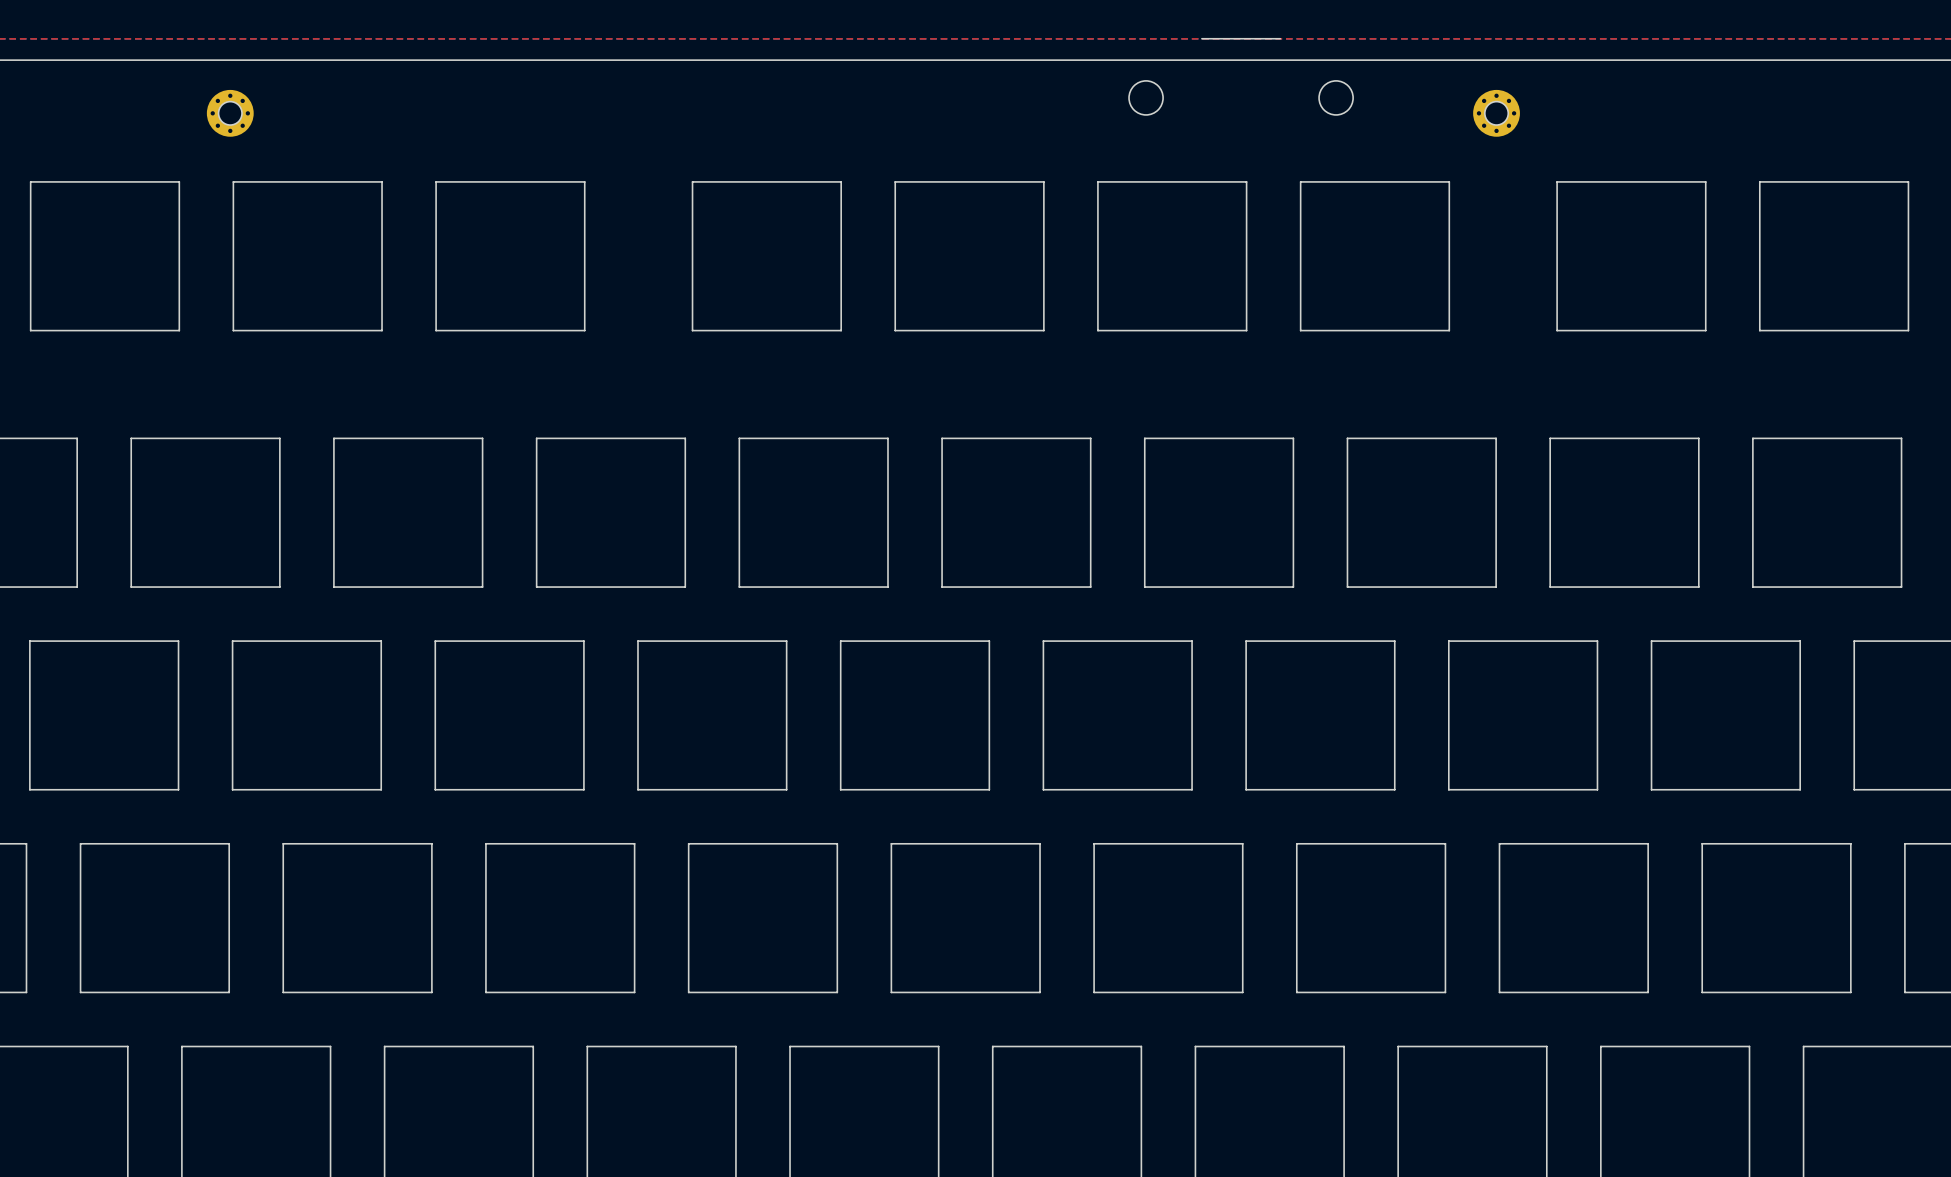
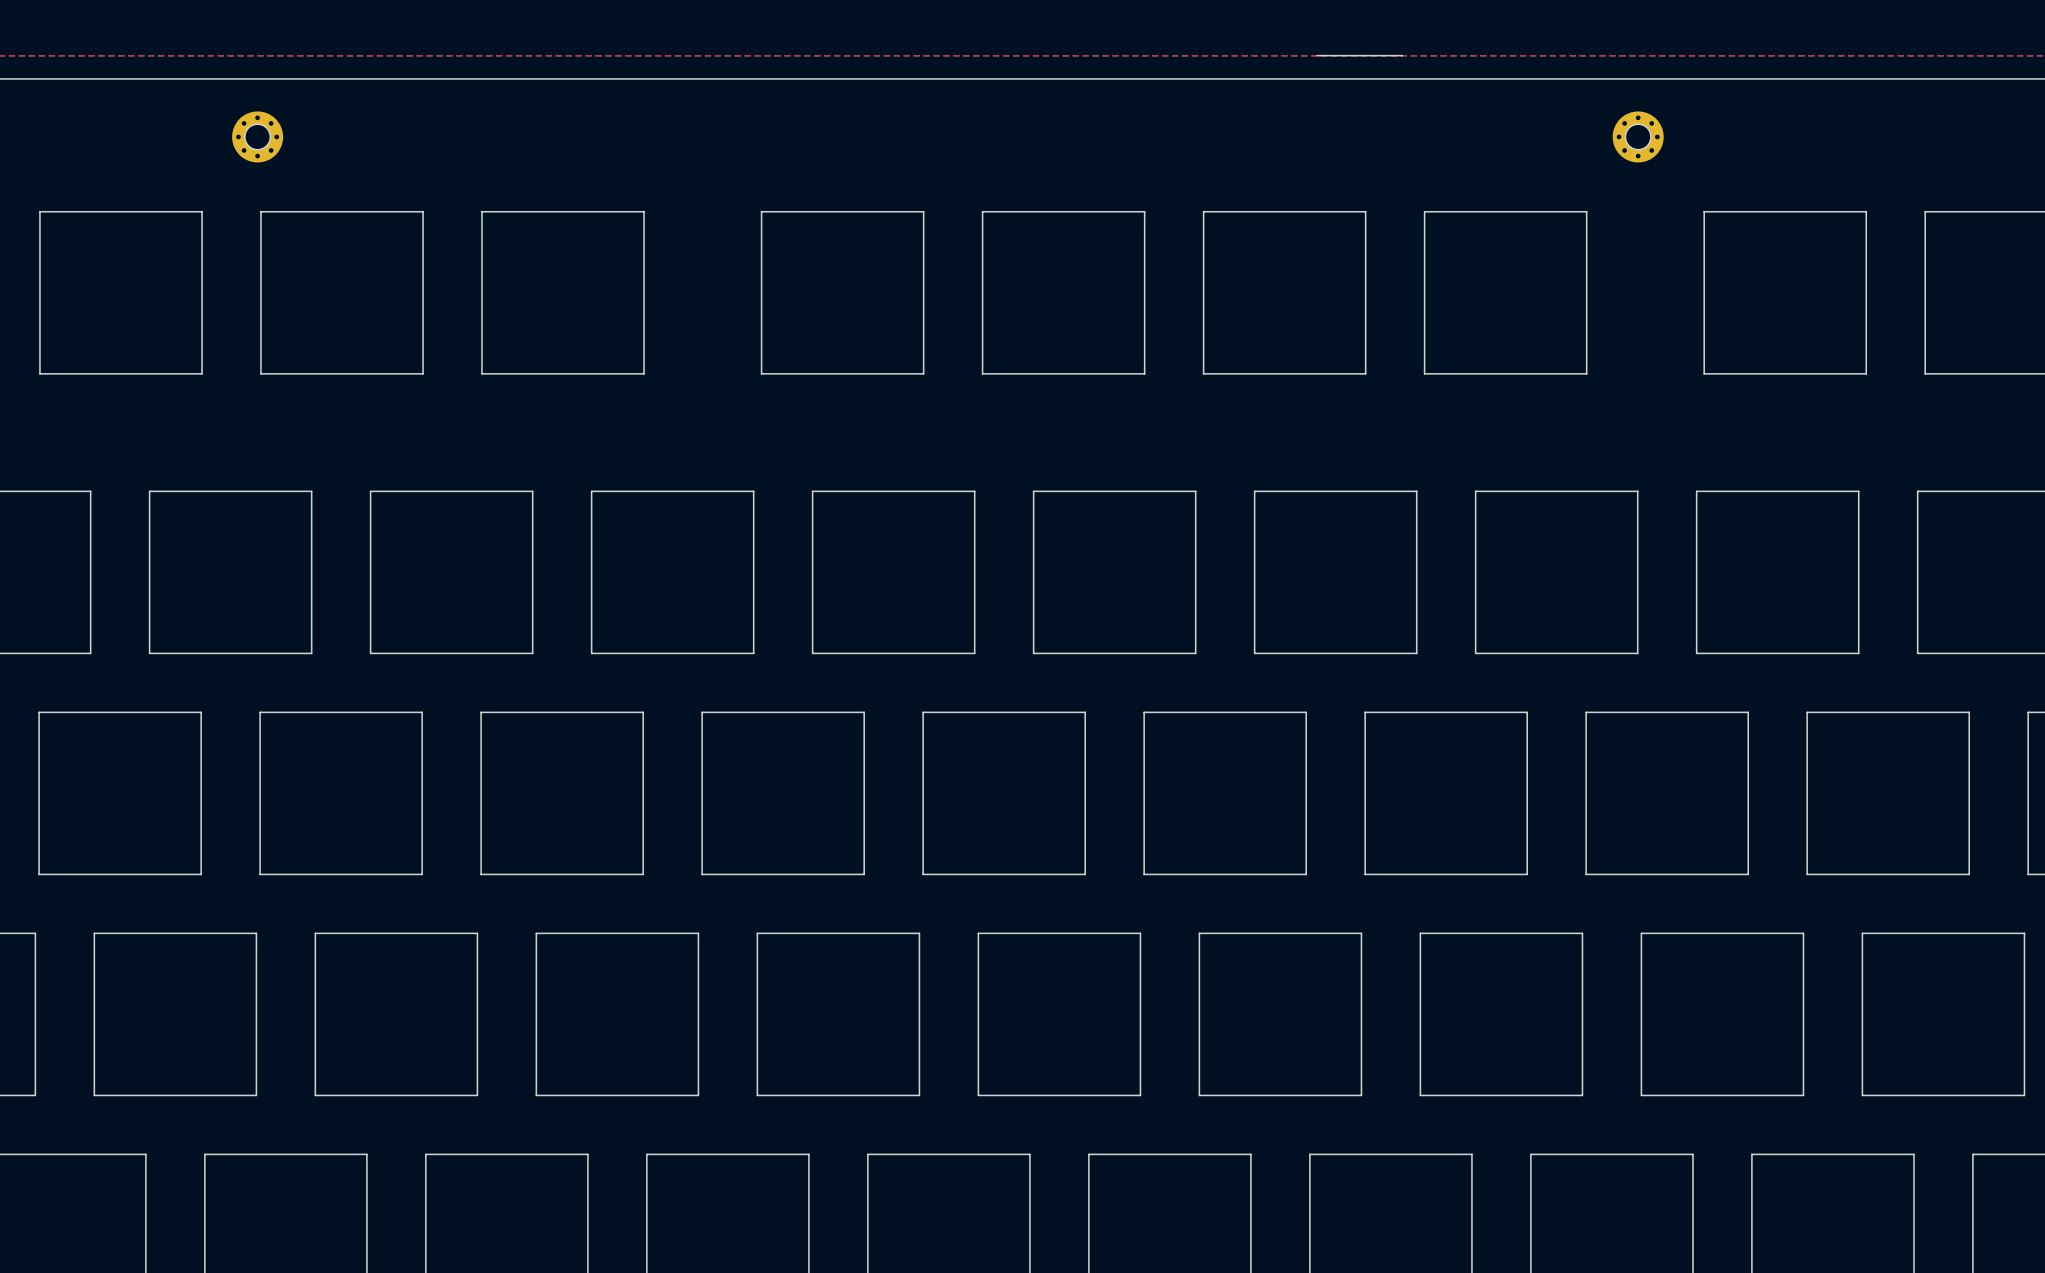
round board edge: [1128, 80, 1164, 116] -> none
round board edge: [1318, 80, 1354, 116] -> none

